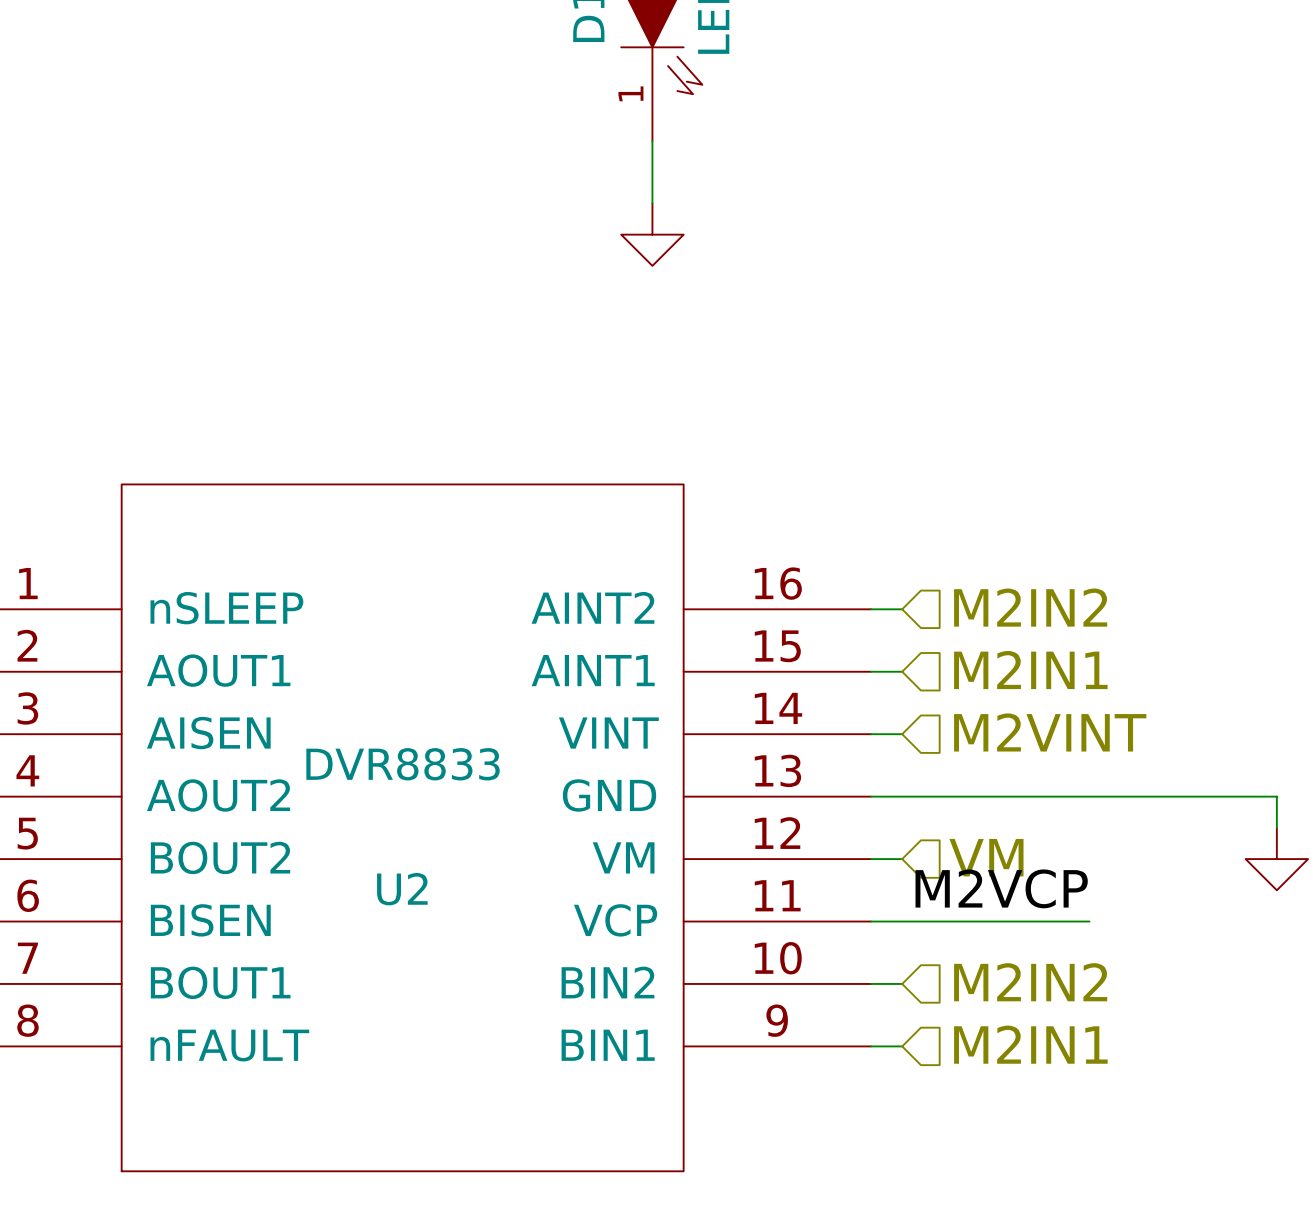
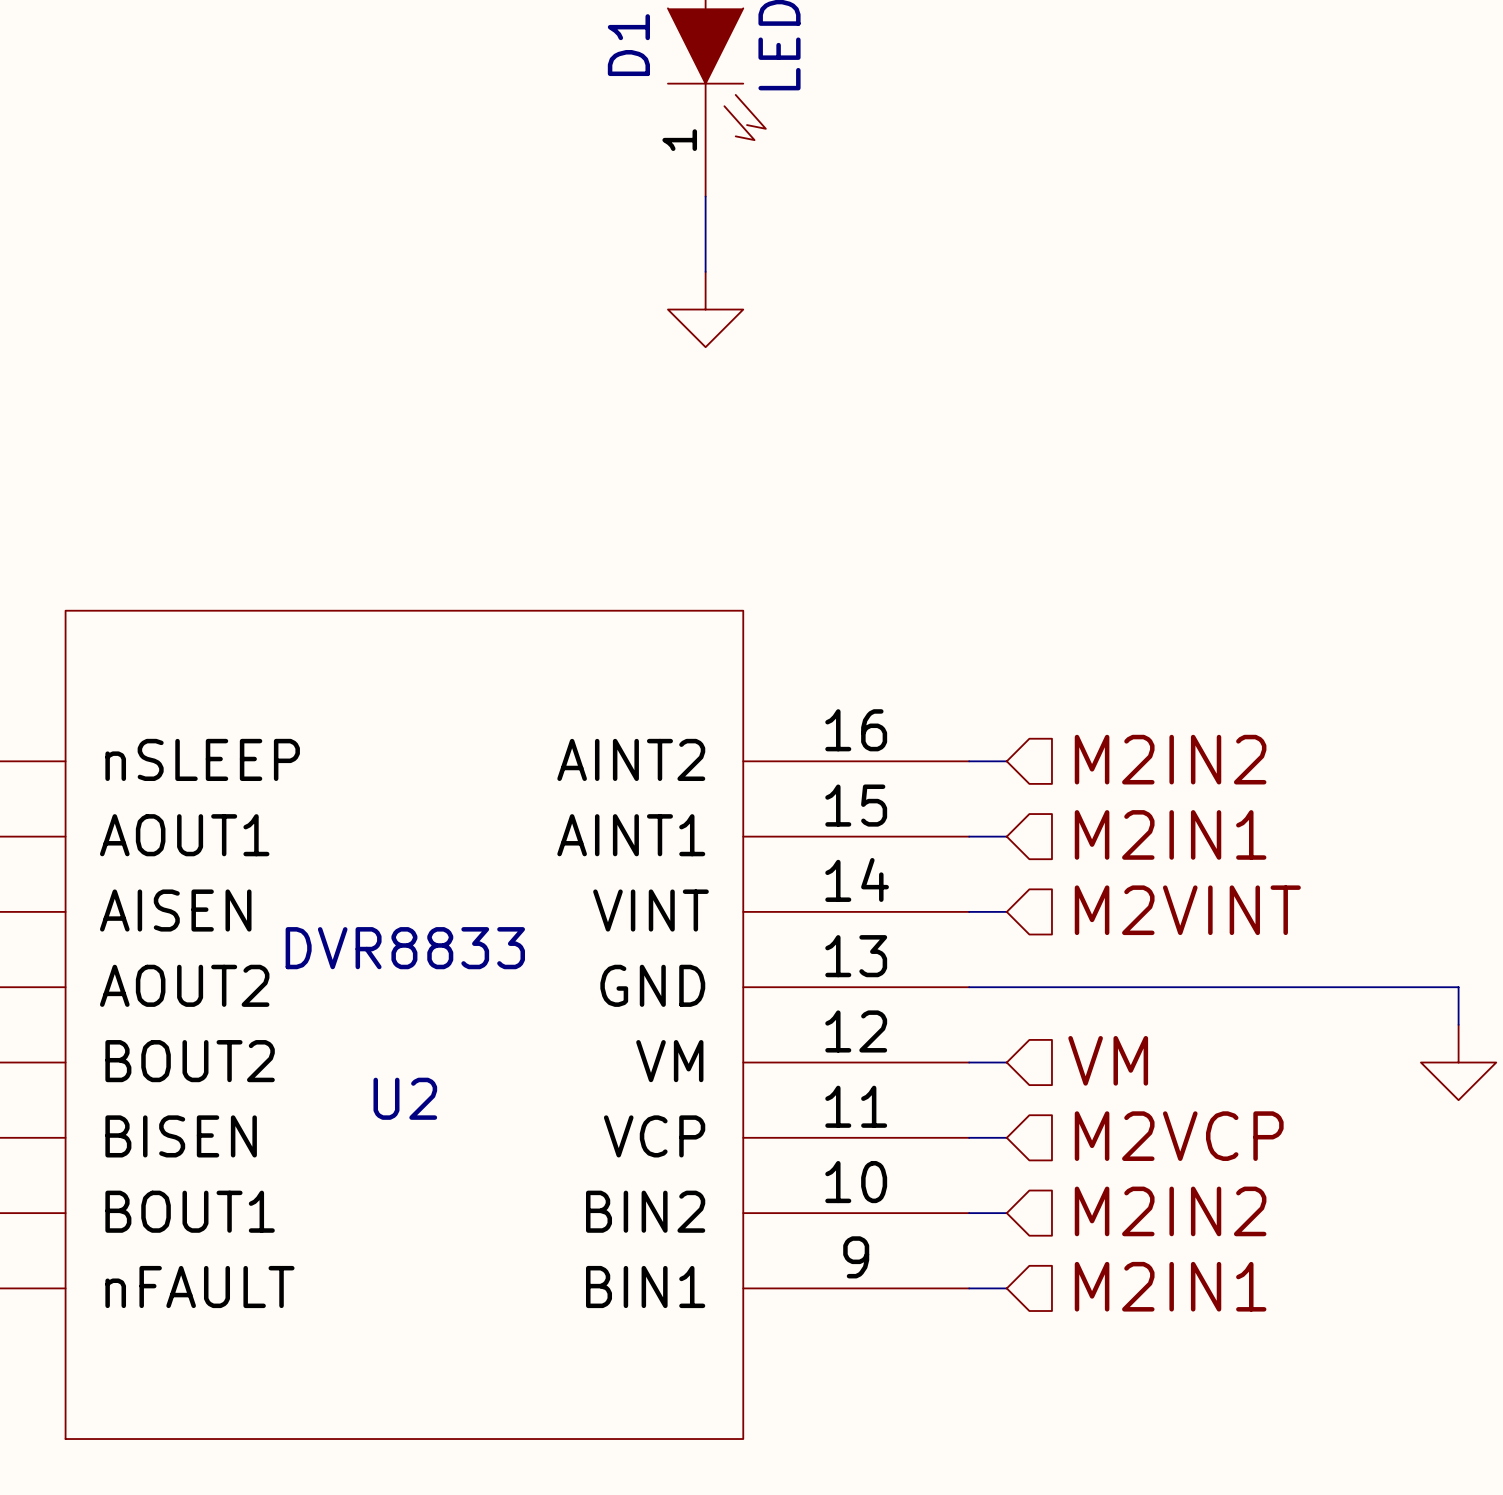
label: M2VCP (1001, 888) -> none
hierarchical label: none -> M2VCP (1179, 1136)
wire: (902, 921) (1089, 921) -> none

